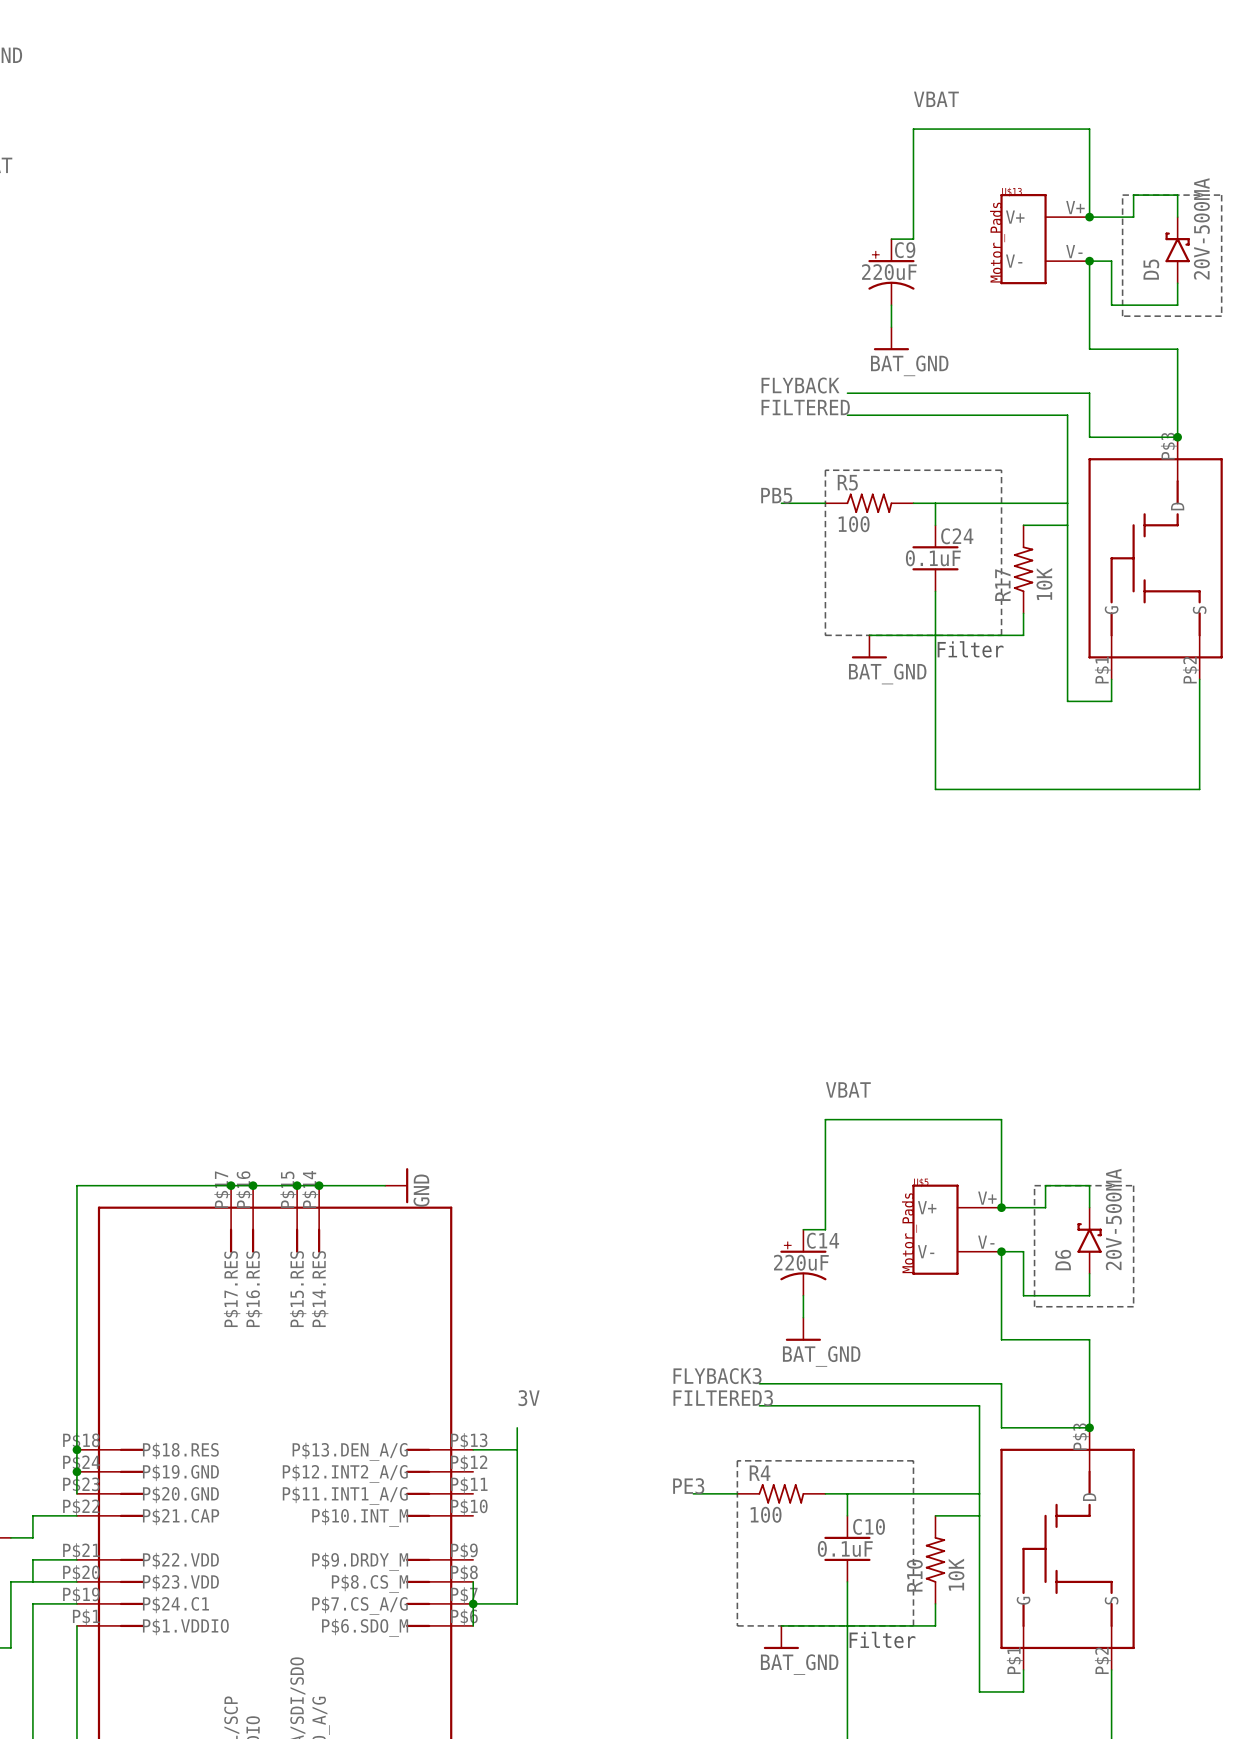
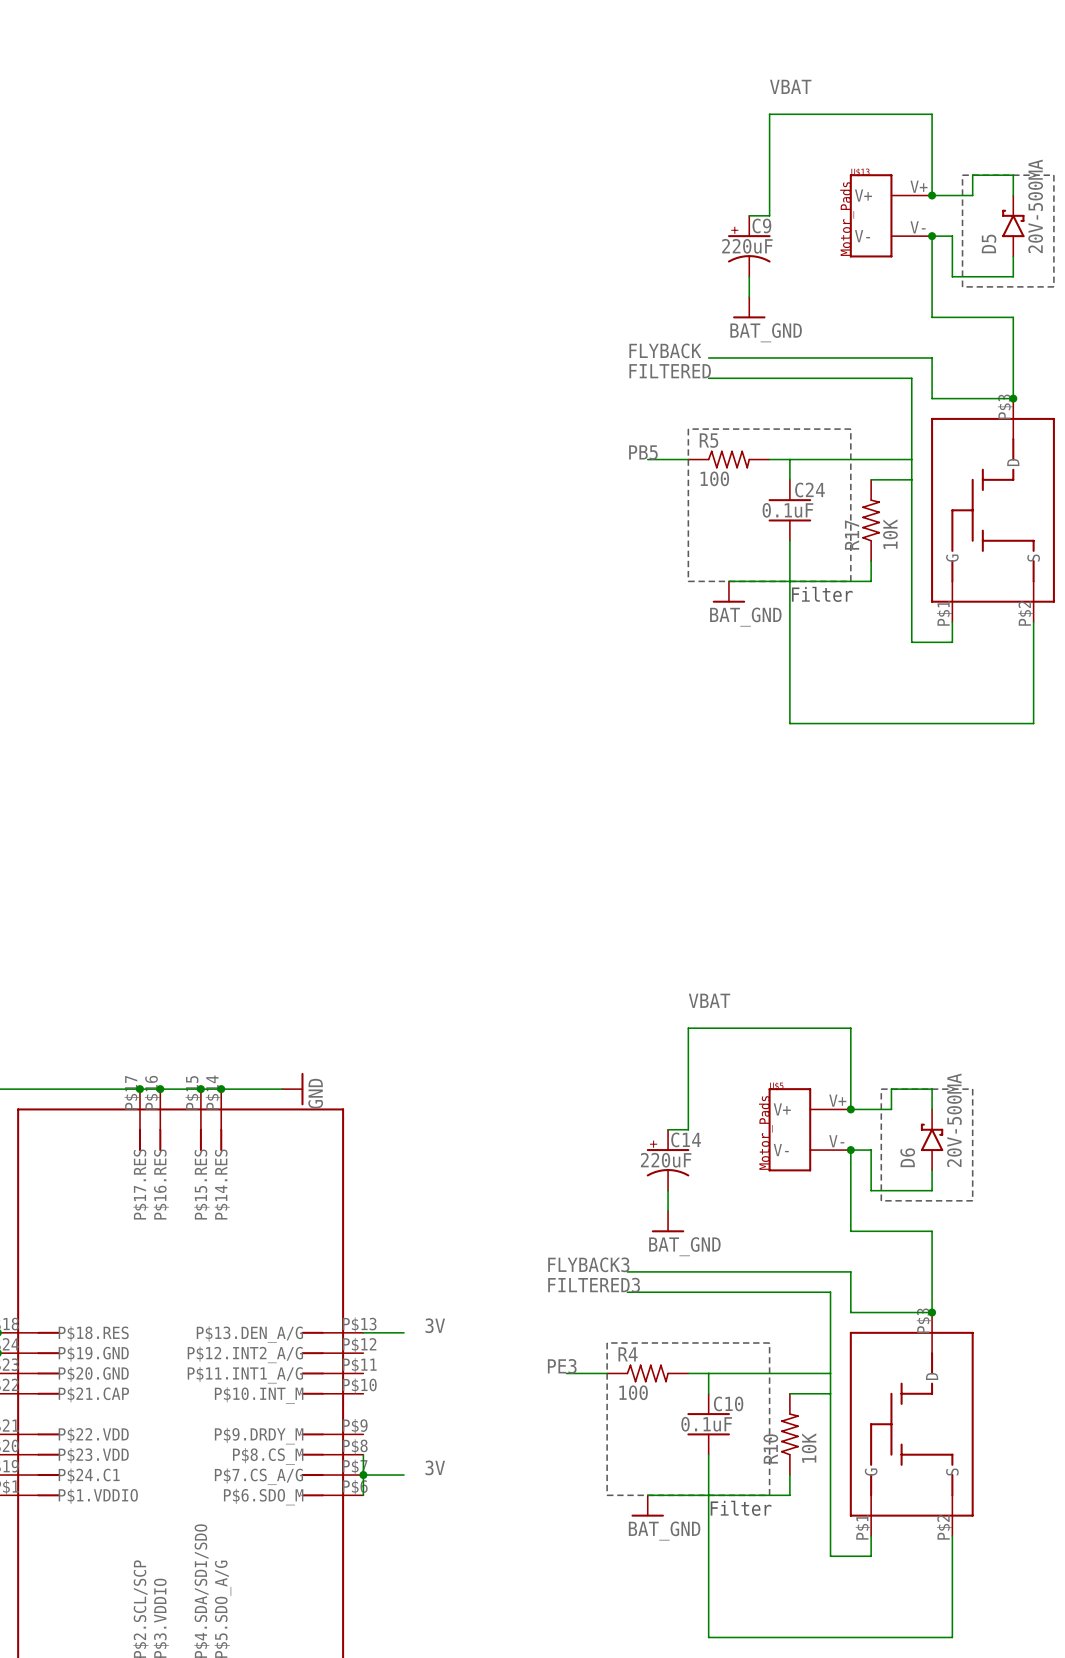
label position: 3V (529, 1398) -> 3V (435, 1325)
wire: (517, 1427) (517, 1603) -> none
label: none -> 3V (435, 1467)

